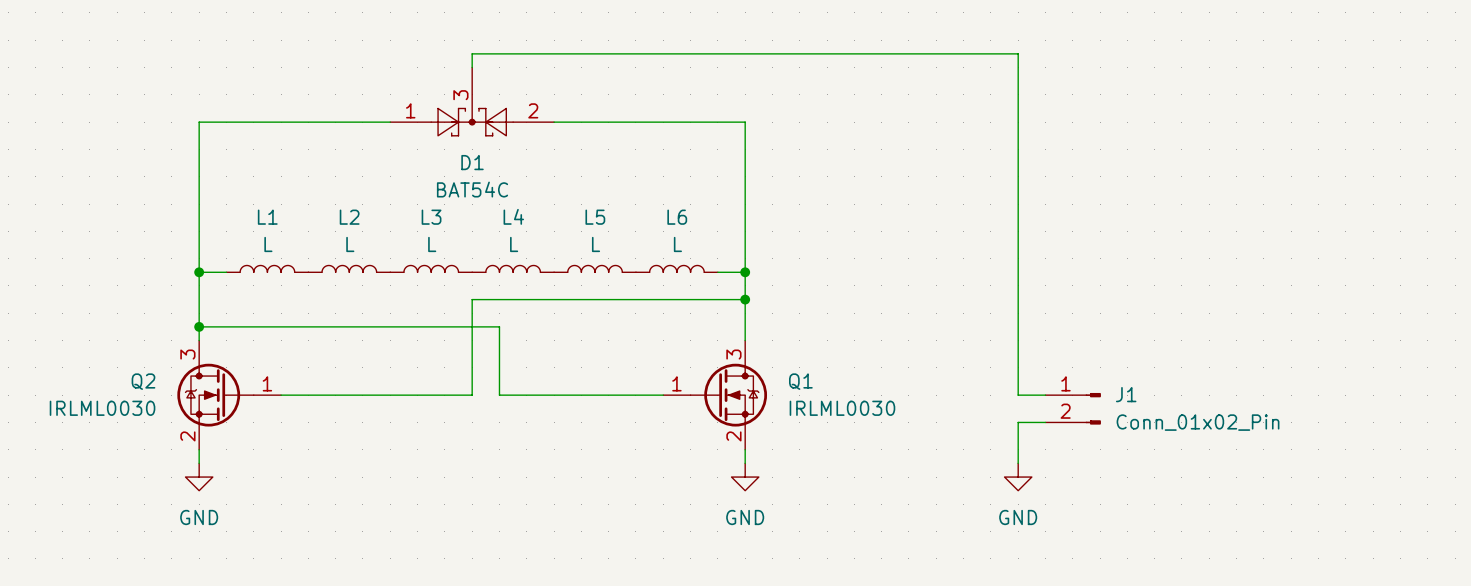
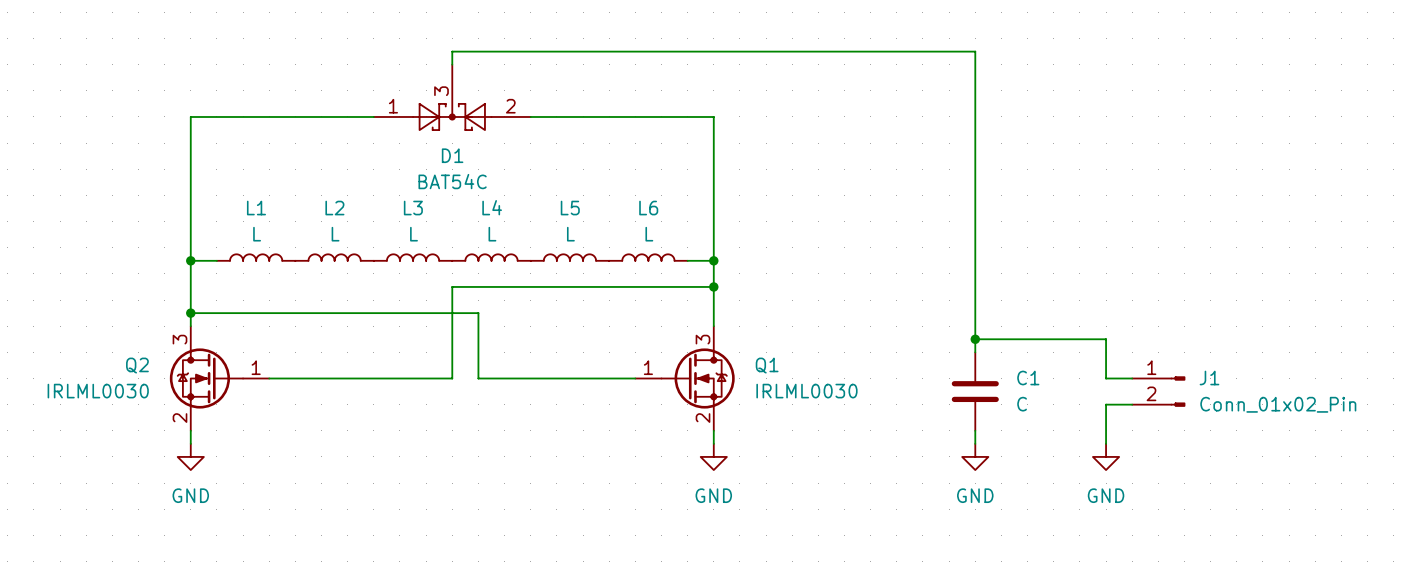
wire: none -> (975, 339) (1106, 339) (1106, 378) (1132, 378)
junction: none -> (975, 339)
wire: (1018, 367) (1018, 395) (1045, 395) -> none
C1: none -> C (975, 391)
J1 position: (1073, 408) -> (1158, 391)
wire: (1045, 422) (1018, 422) (1018, 449) -> none
wire: none -> (1132, 404) (1106, 404) (1106, 443)
power symbol: none -> GND (1106, 456)

